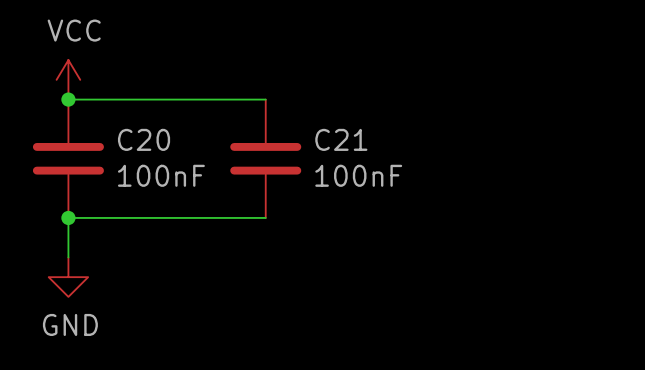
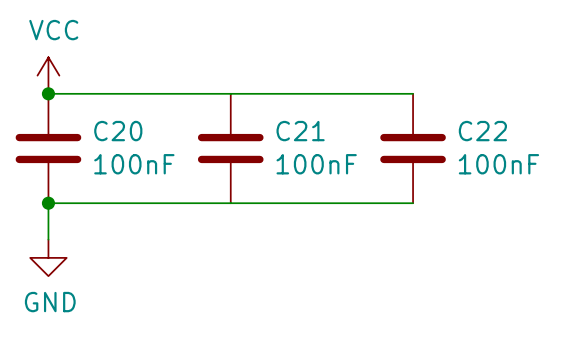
wire: none -> (230, 93) (413, 93)
C22: none -> 100nF (413, 148)
wire: none -> (230, 203) (413, 203)

